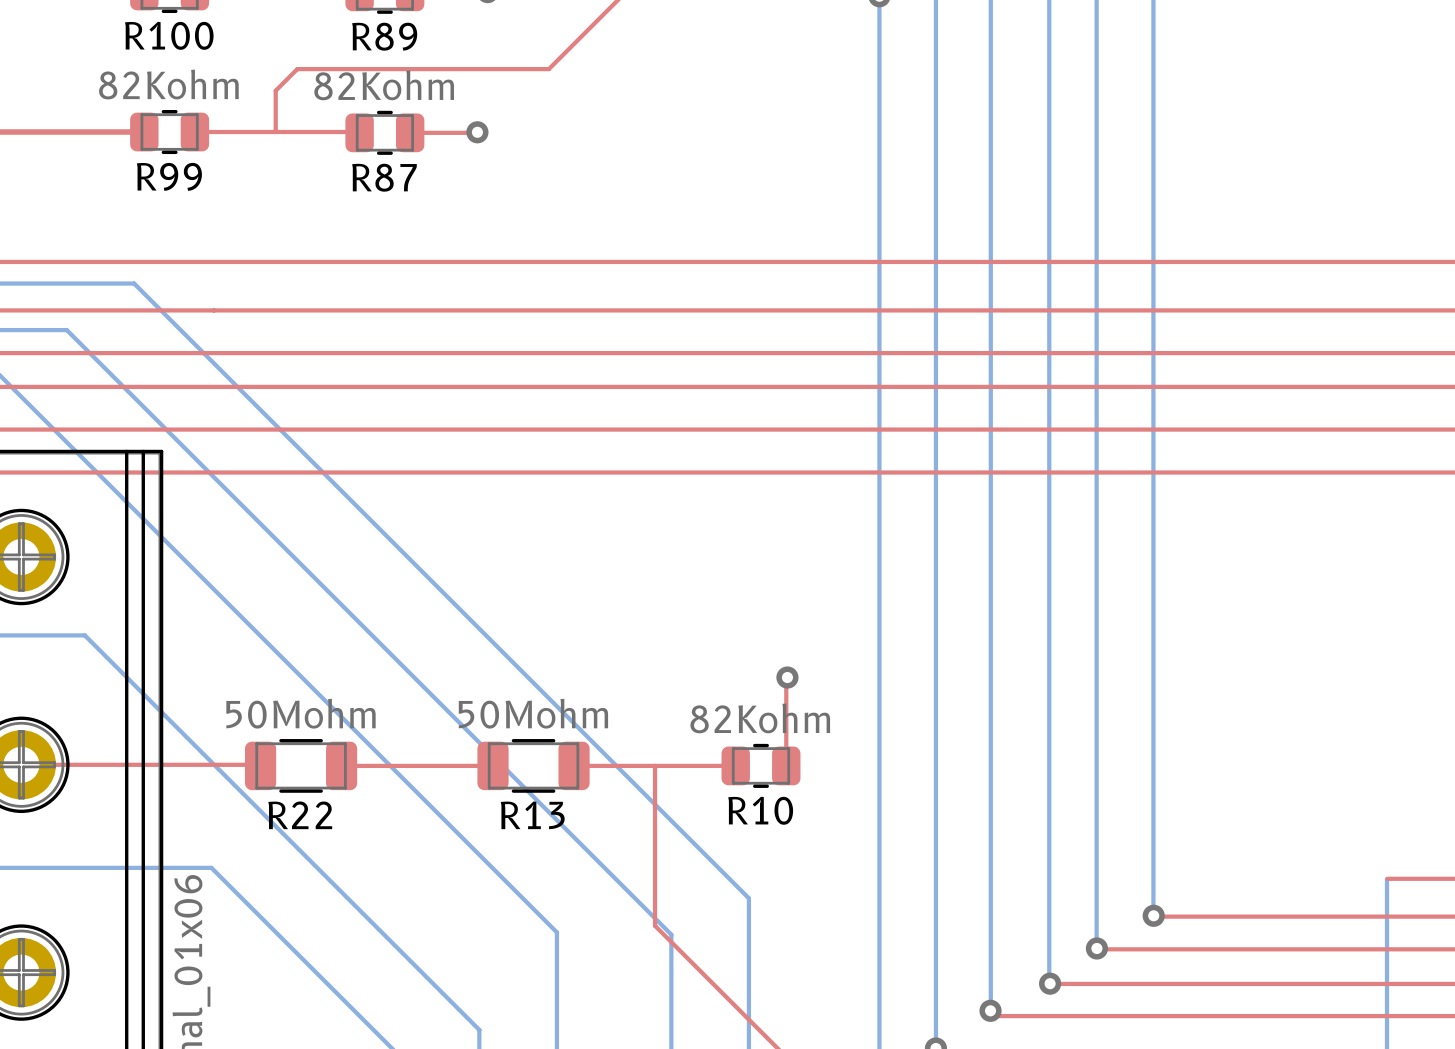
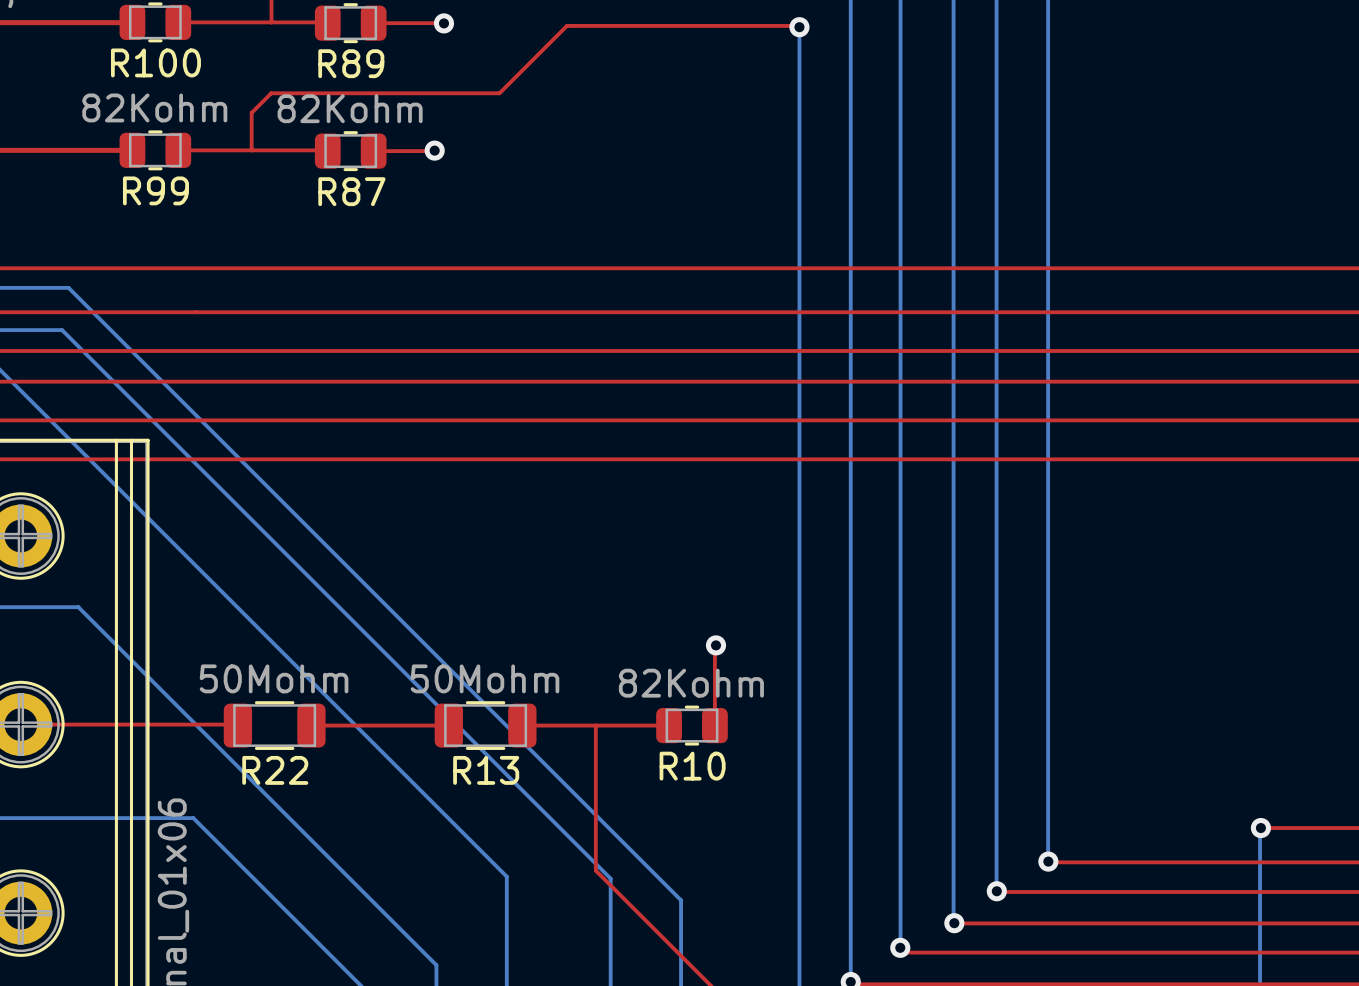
bottom track: (74, 283) (134, 283) (748, 898) (748, 958) -> (68, 287) (681, 900)
via: none -> (1260, 828)

